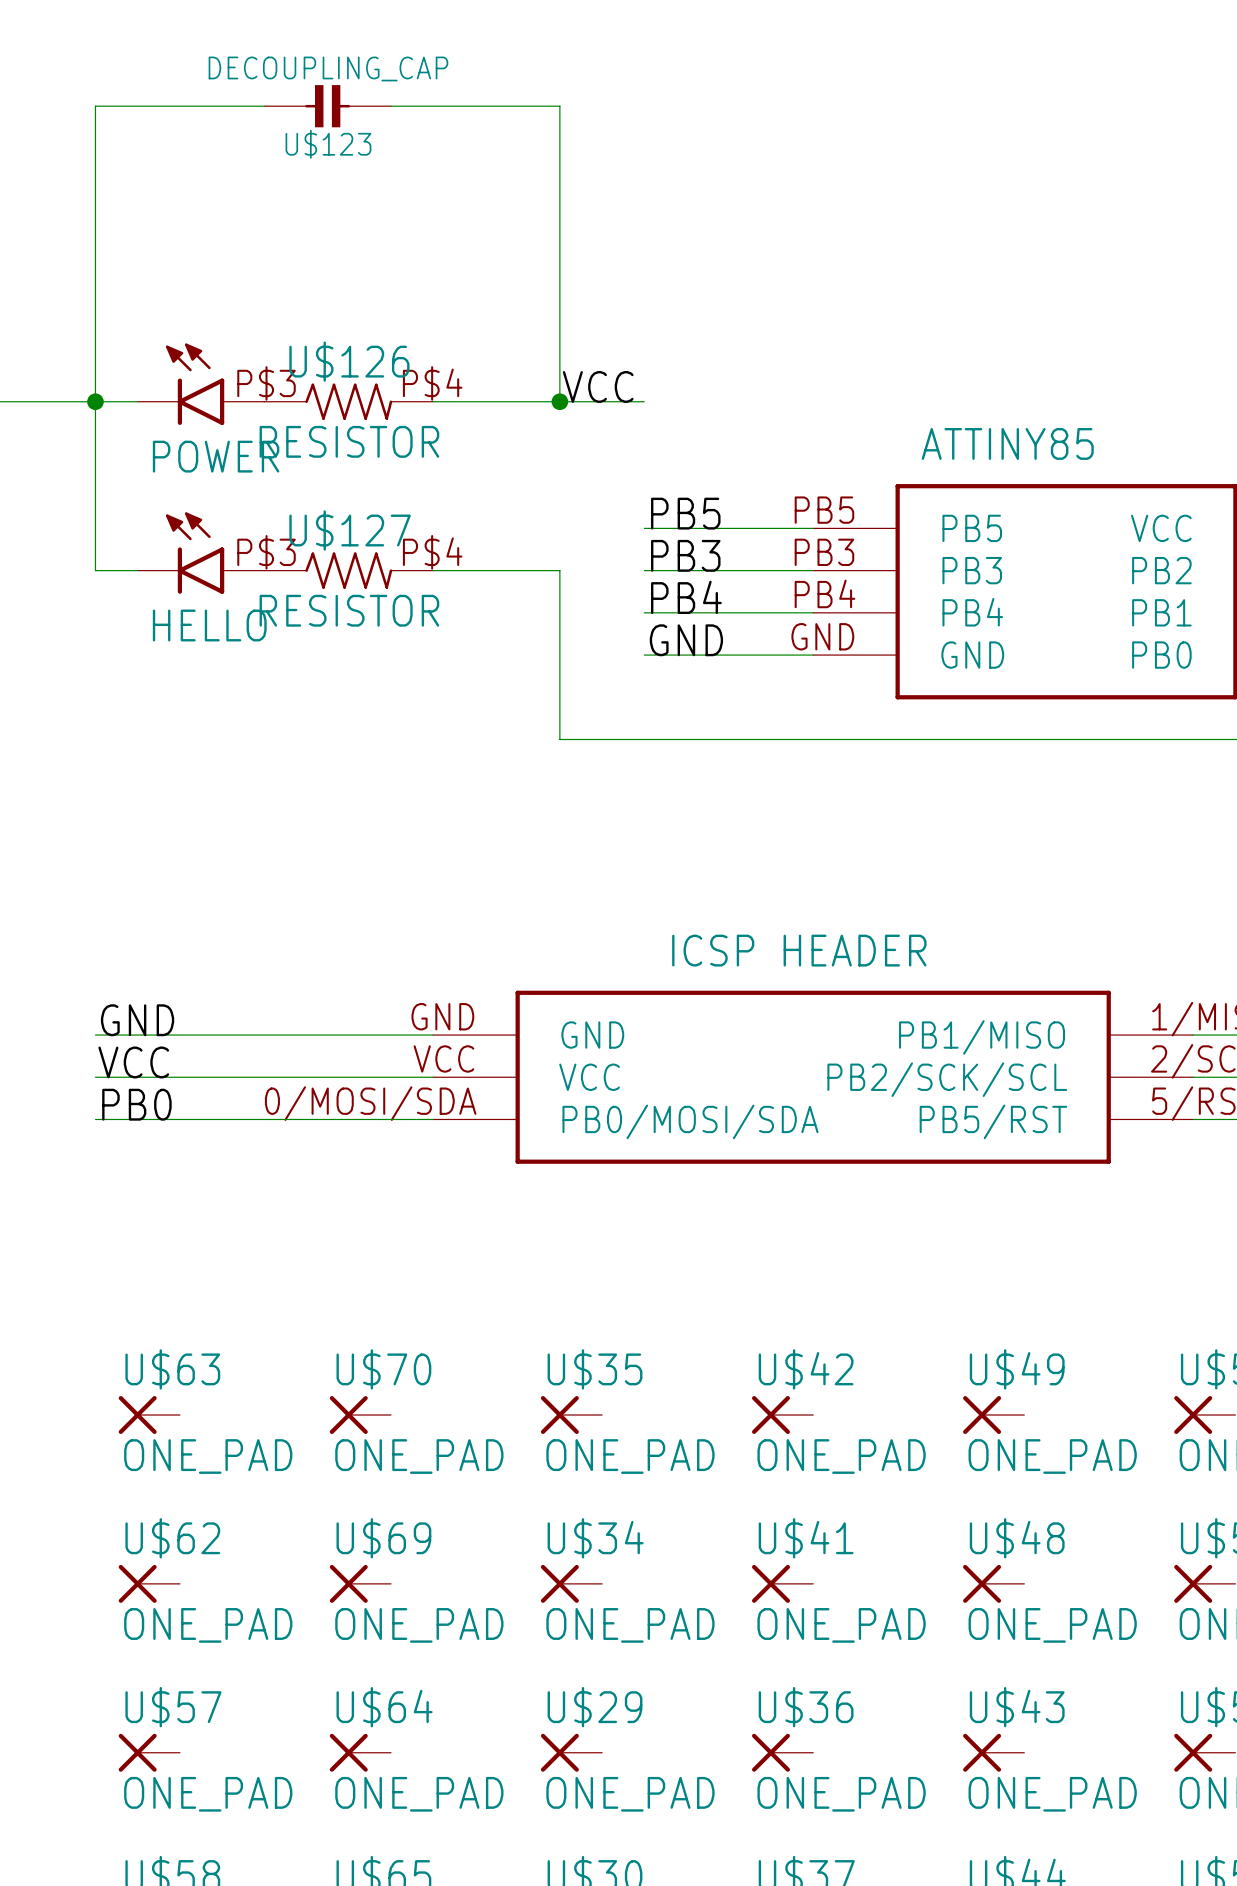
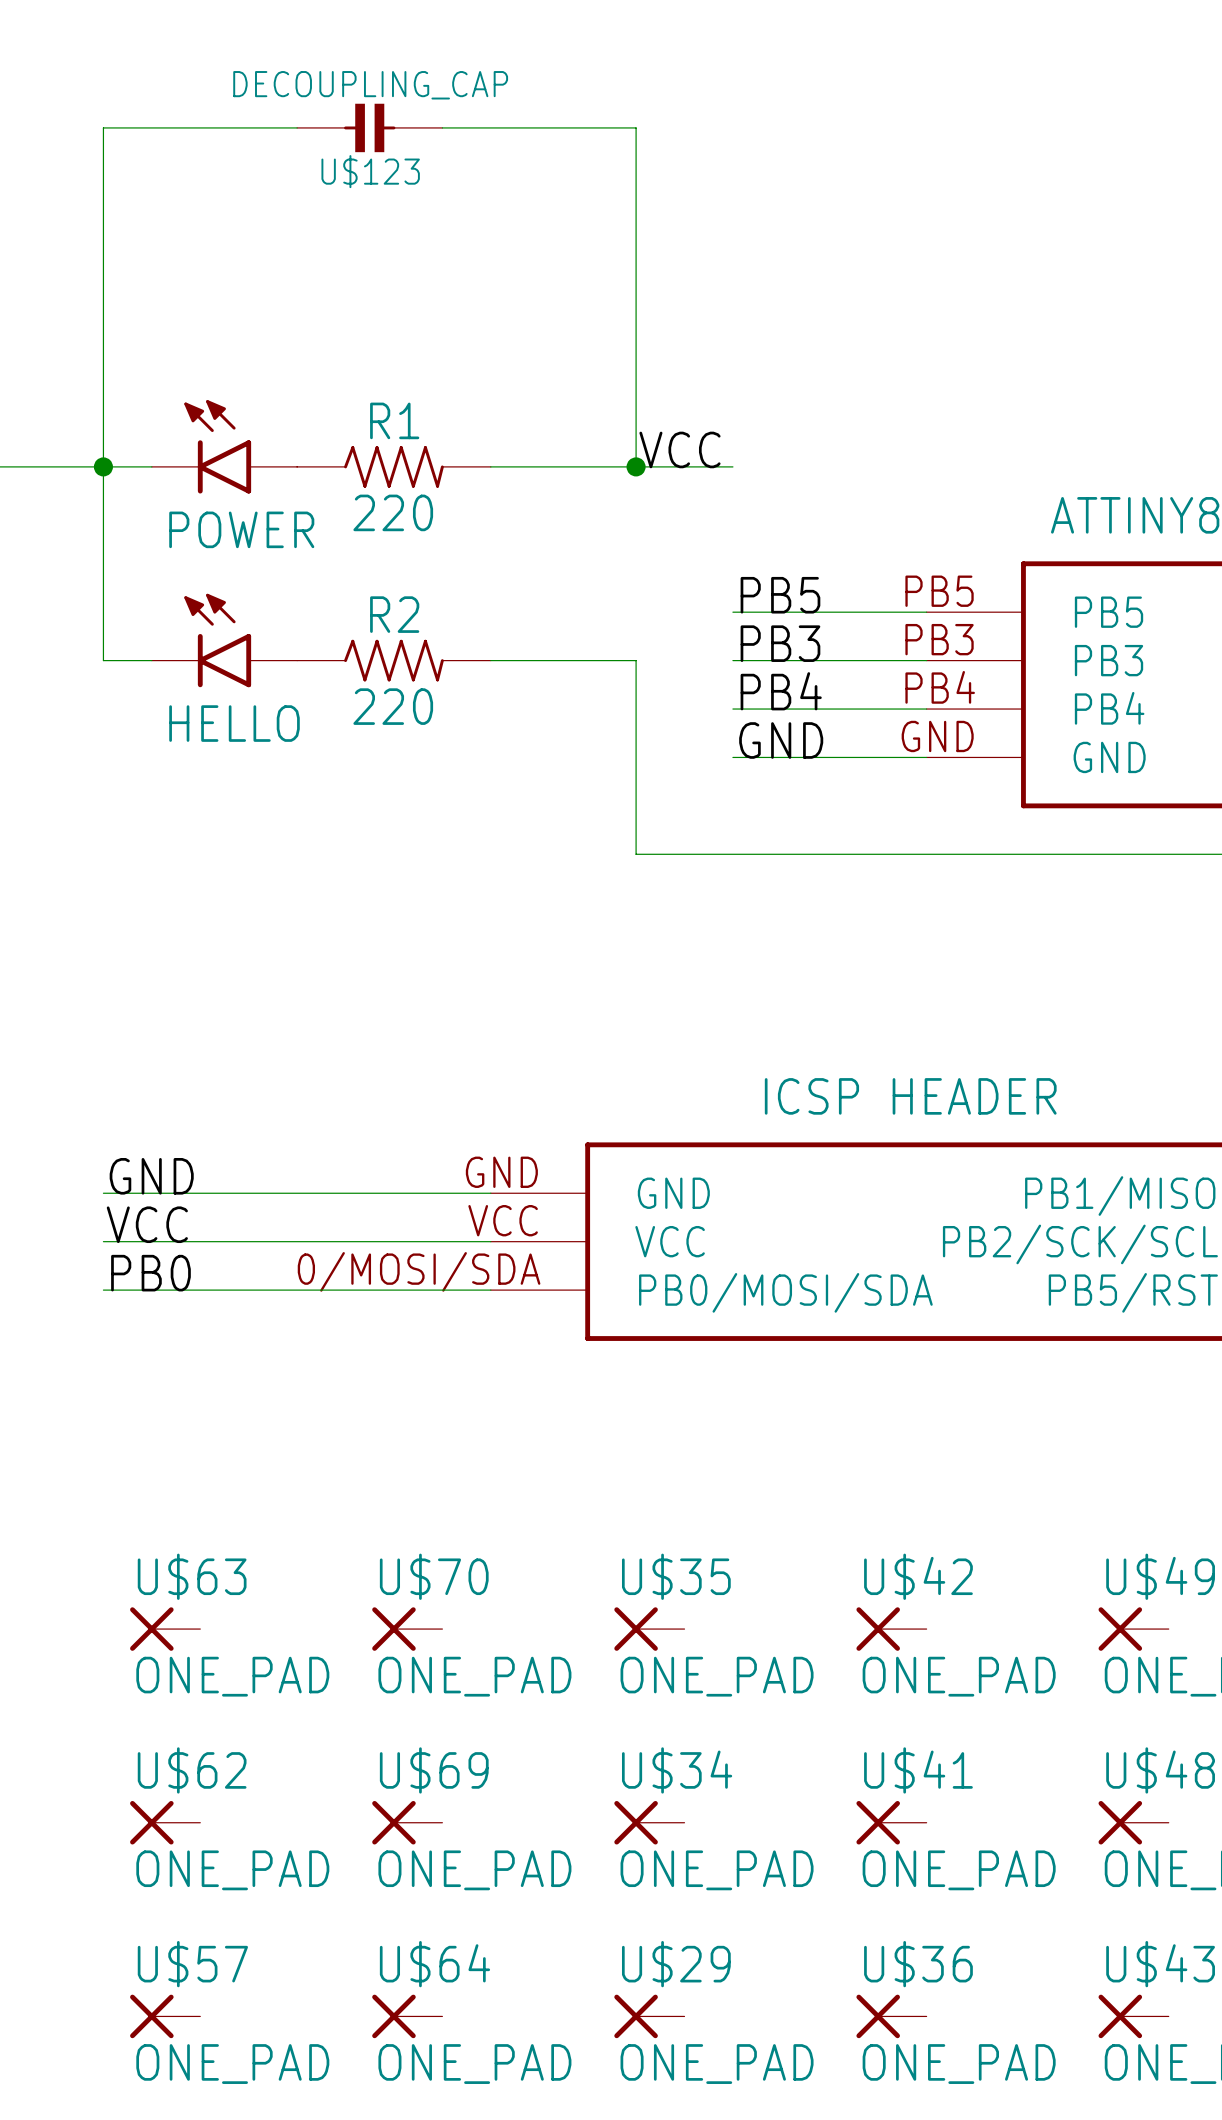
U$126 name: U$126 (349, 361) -> R1 (394, 420)
U$126 pin number: P$3 (266, 383) -> none
U$126 pin number: P$4 (432, 383) -> none
U$126 value: RESISTOR (349, 441) -> 220 (393, 512)
U$127 name: U$127 (350, 530) -> R2 (394, 614)
U$127 pin number: P$3 (266, 552) -> none
U$127 pin number: P$4 (432, 552) -> none
U$127 value: RESISTOR (349, 610) -> 220 (393, 706)

